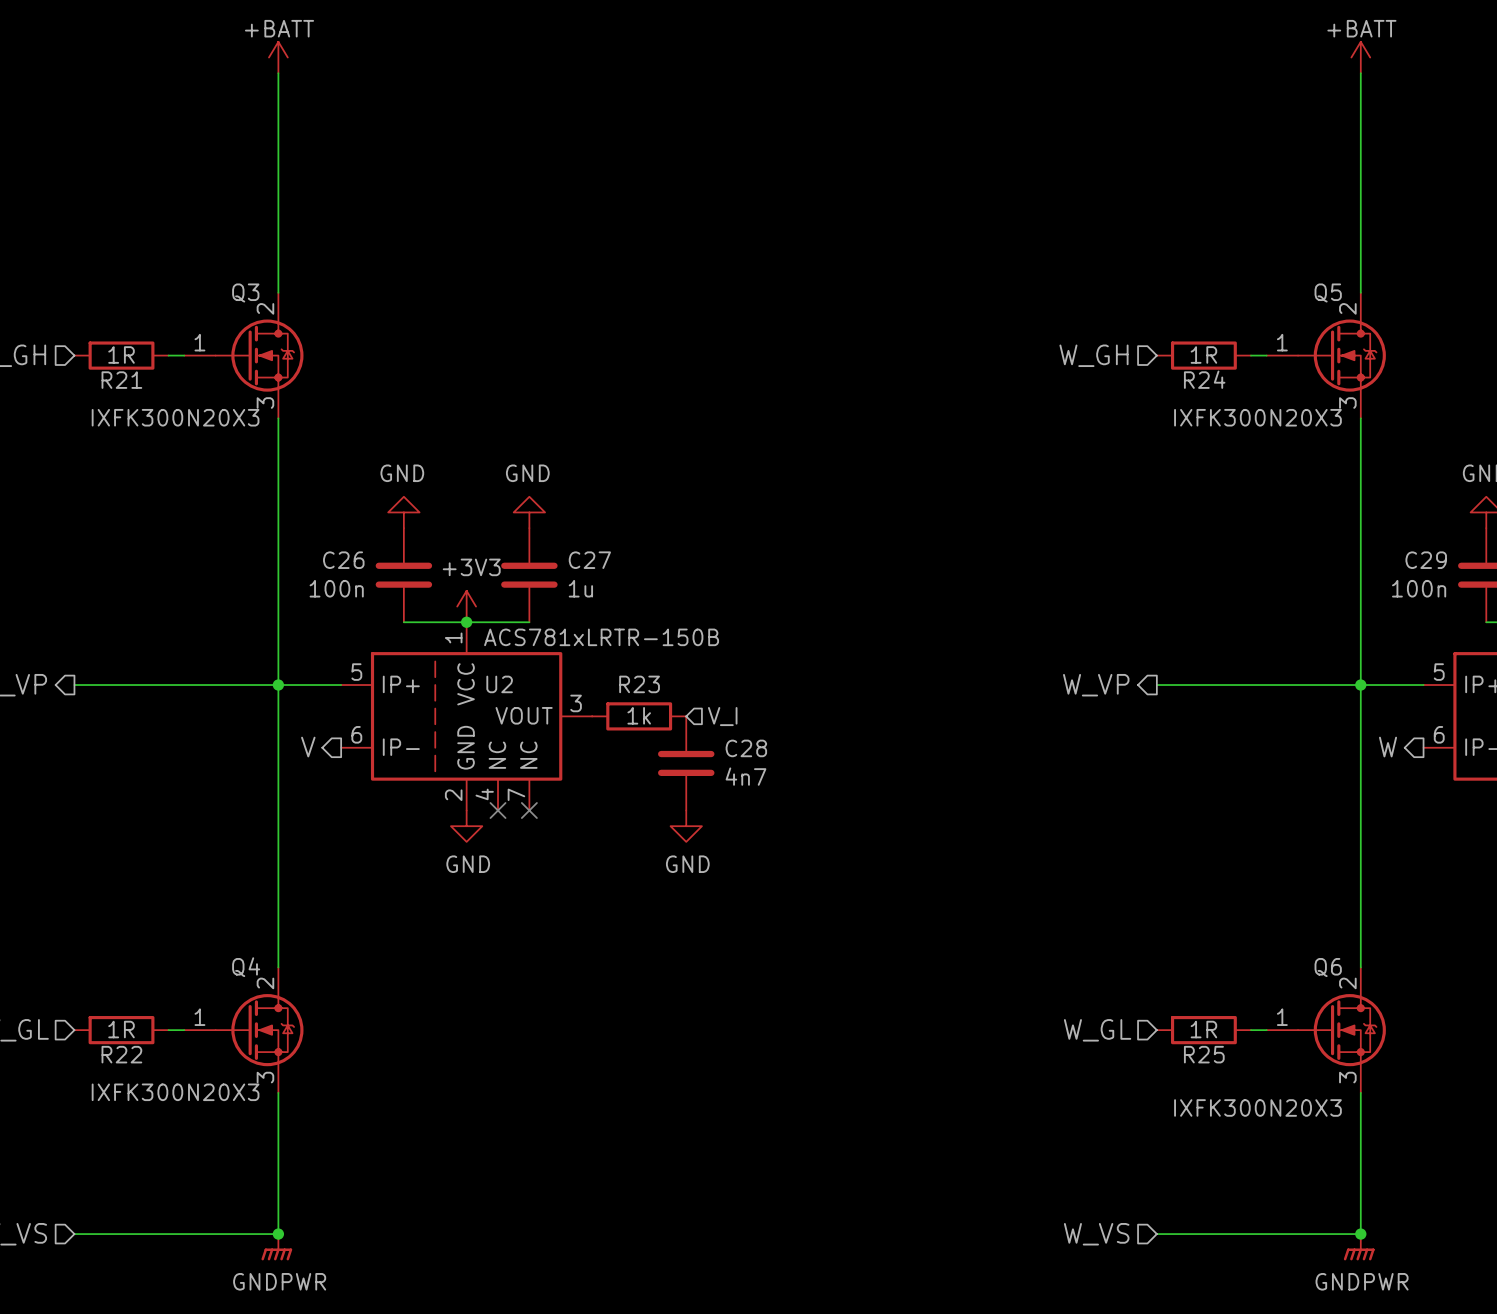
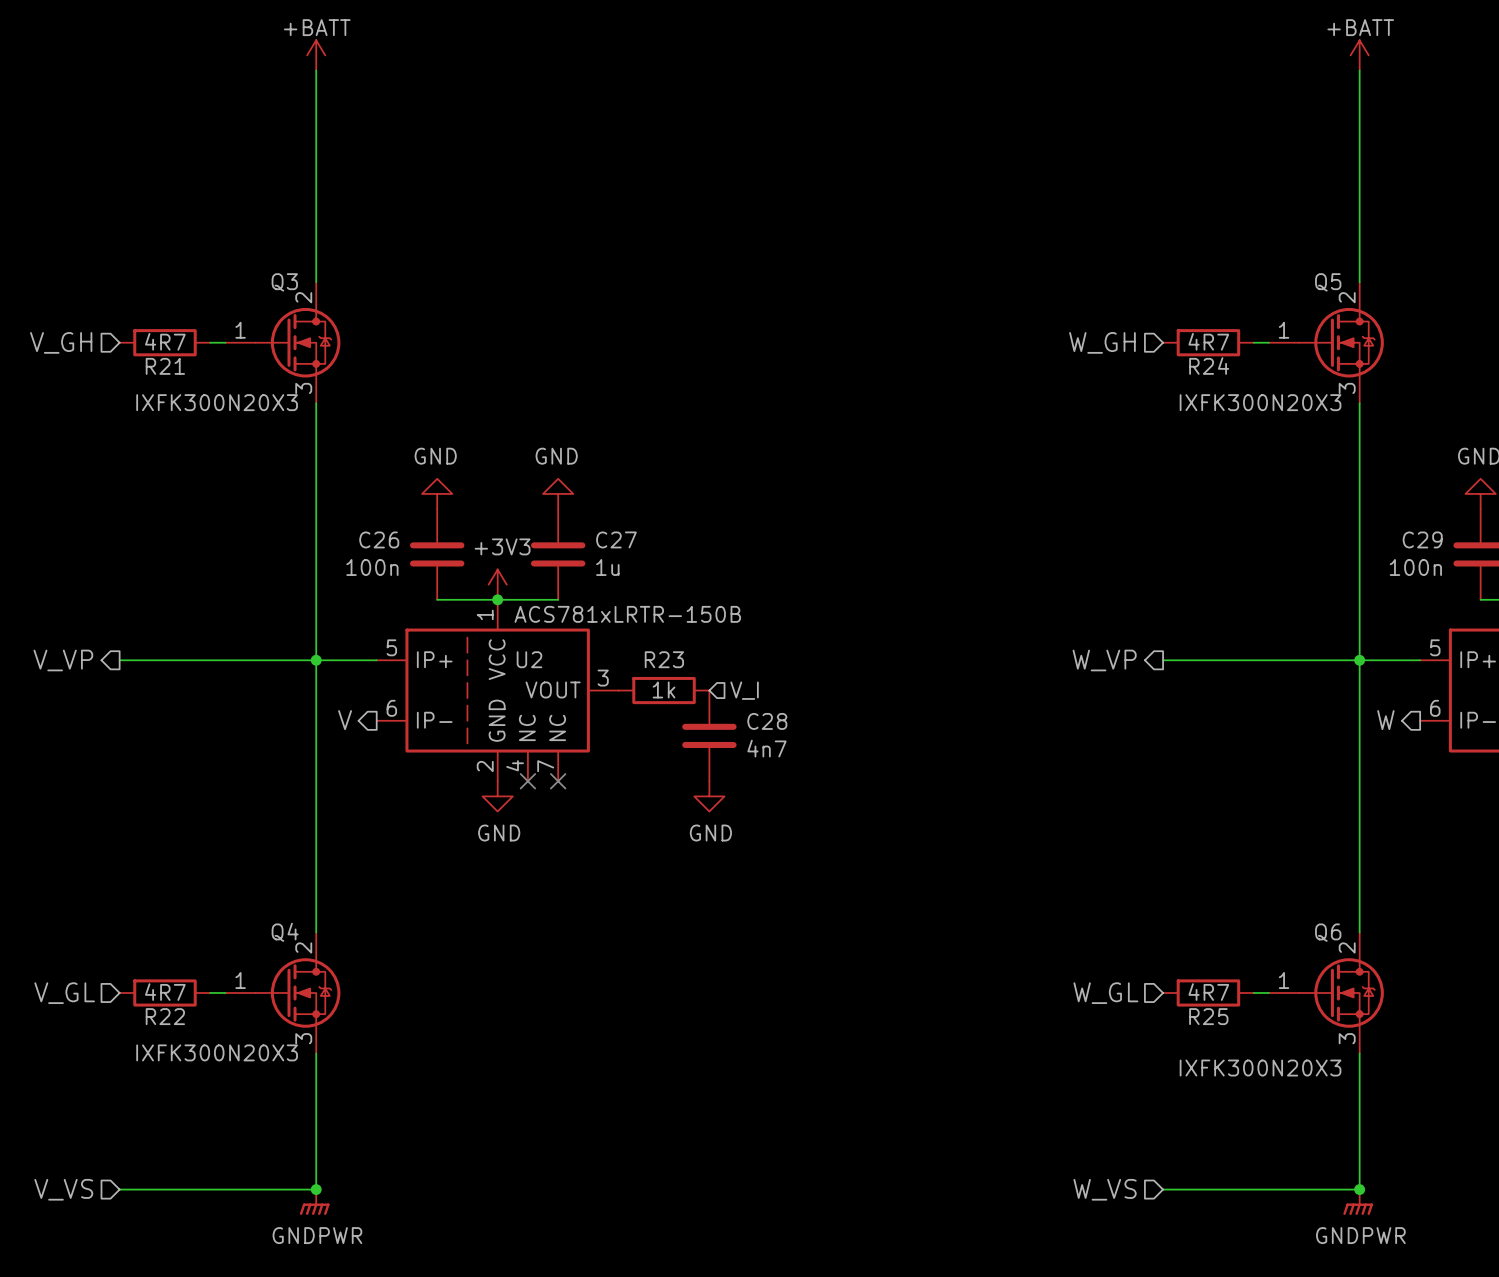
R21 value: 1R (121, 354) -> 4R7 (165, 341)
R24 value: 1R (1203, 354) -> 4R7 (1208, 341)
R22 value: 1R (121, 1029) -> 4R7 (165, 992)
R25 value: 1R (1203, 1029) -> 4R7 (1208, 992)

